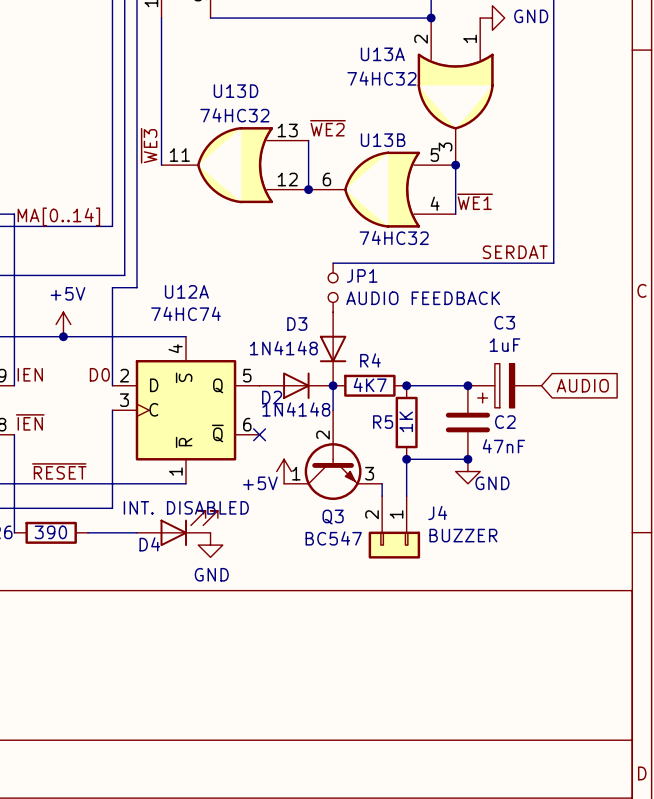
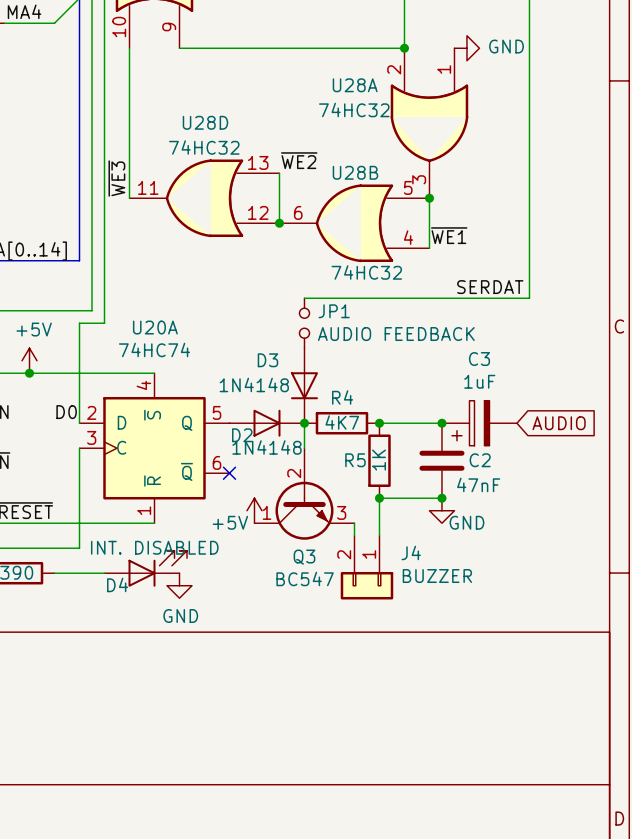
U13A name: U13A (382, 54) -> U28A (355, 85)
U13D name: U13D (236, 91) -> U28D (205, 122)
U13B name: U13B (383, 140) -> U28B (355, 172)
U12A name: U12A (186, 291) -> U20A (155, 327)

